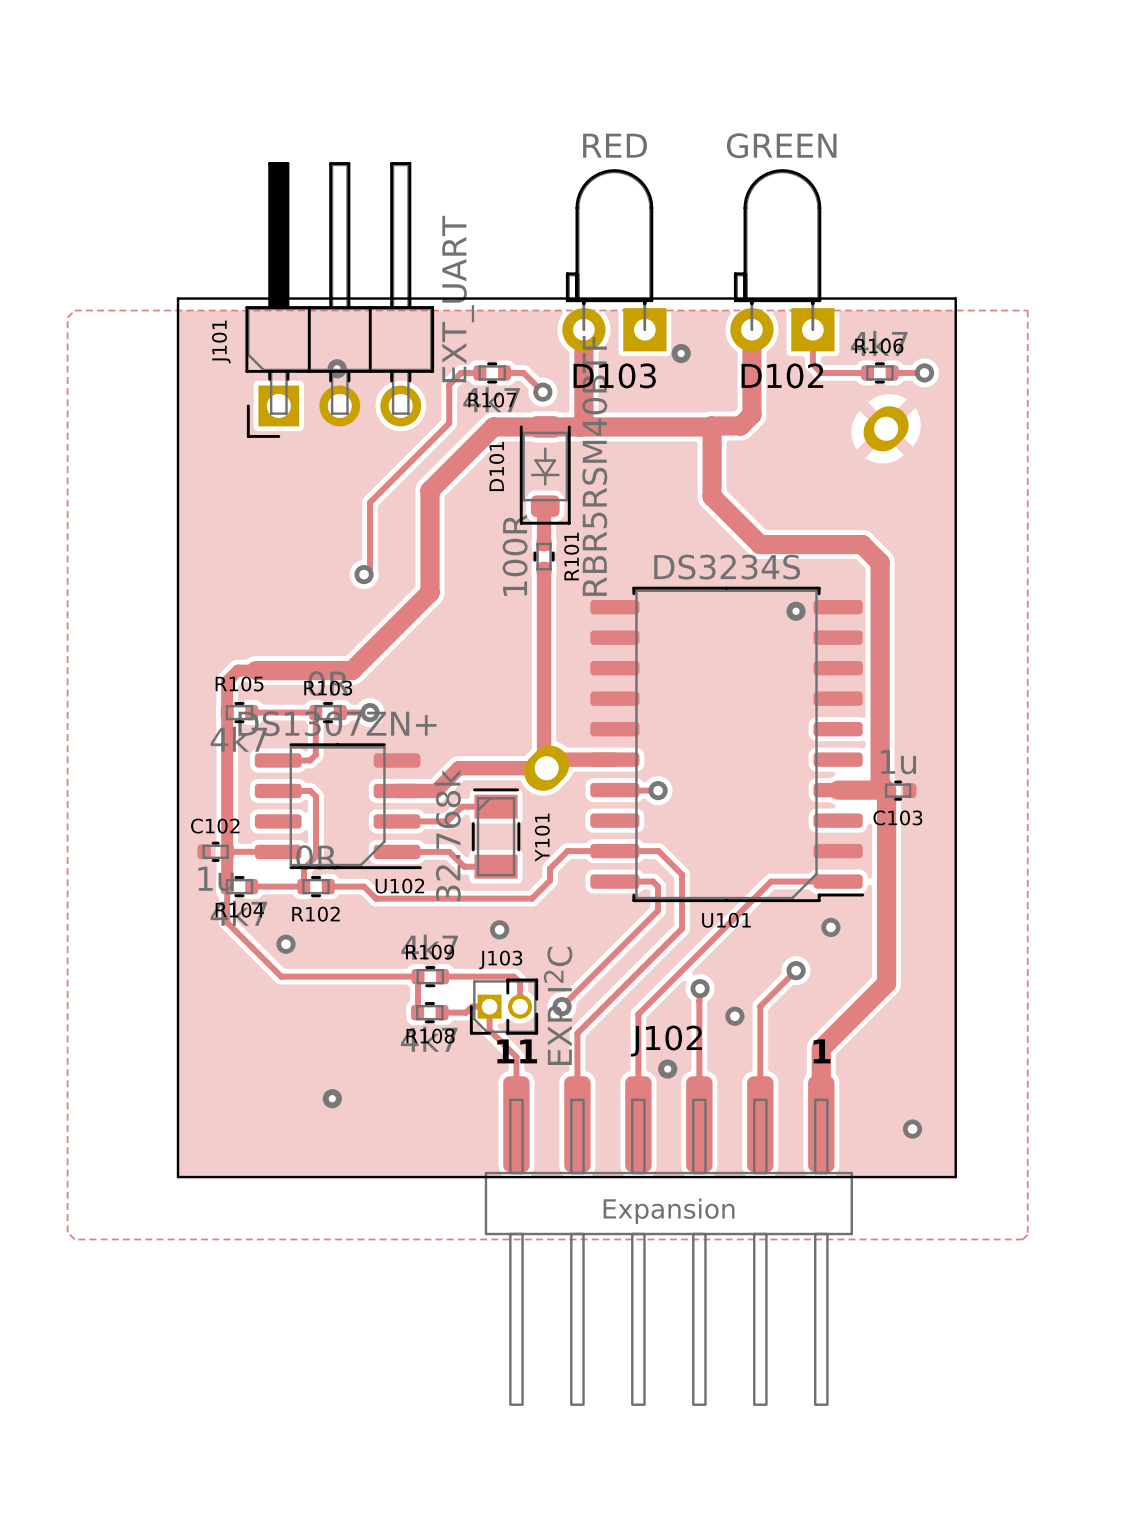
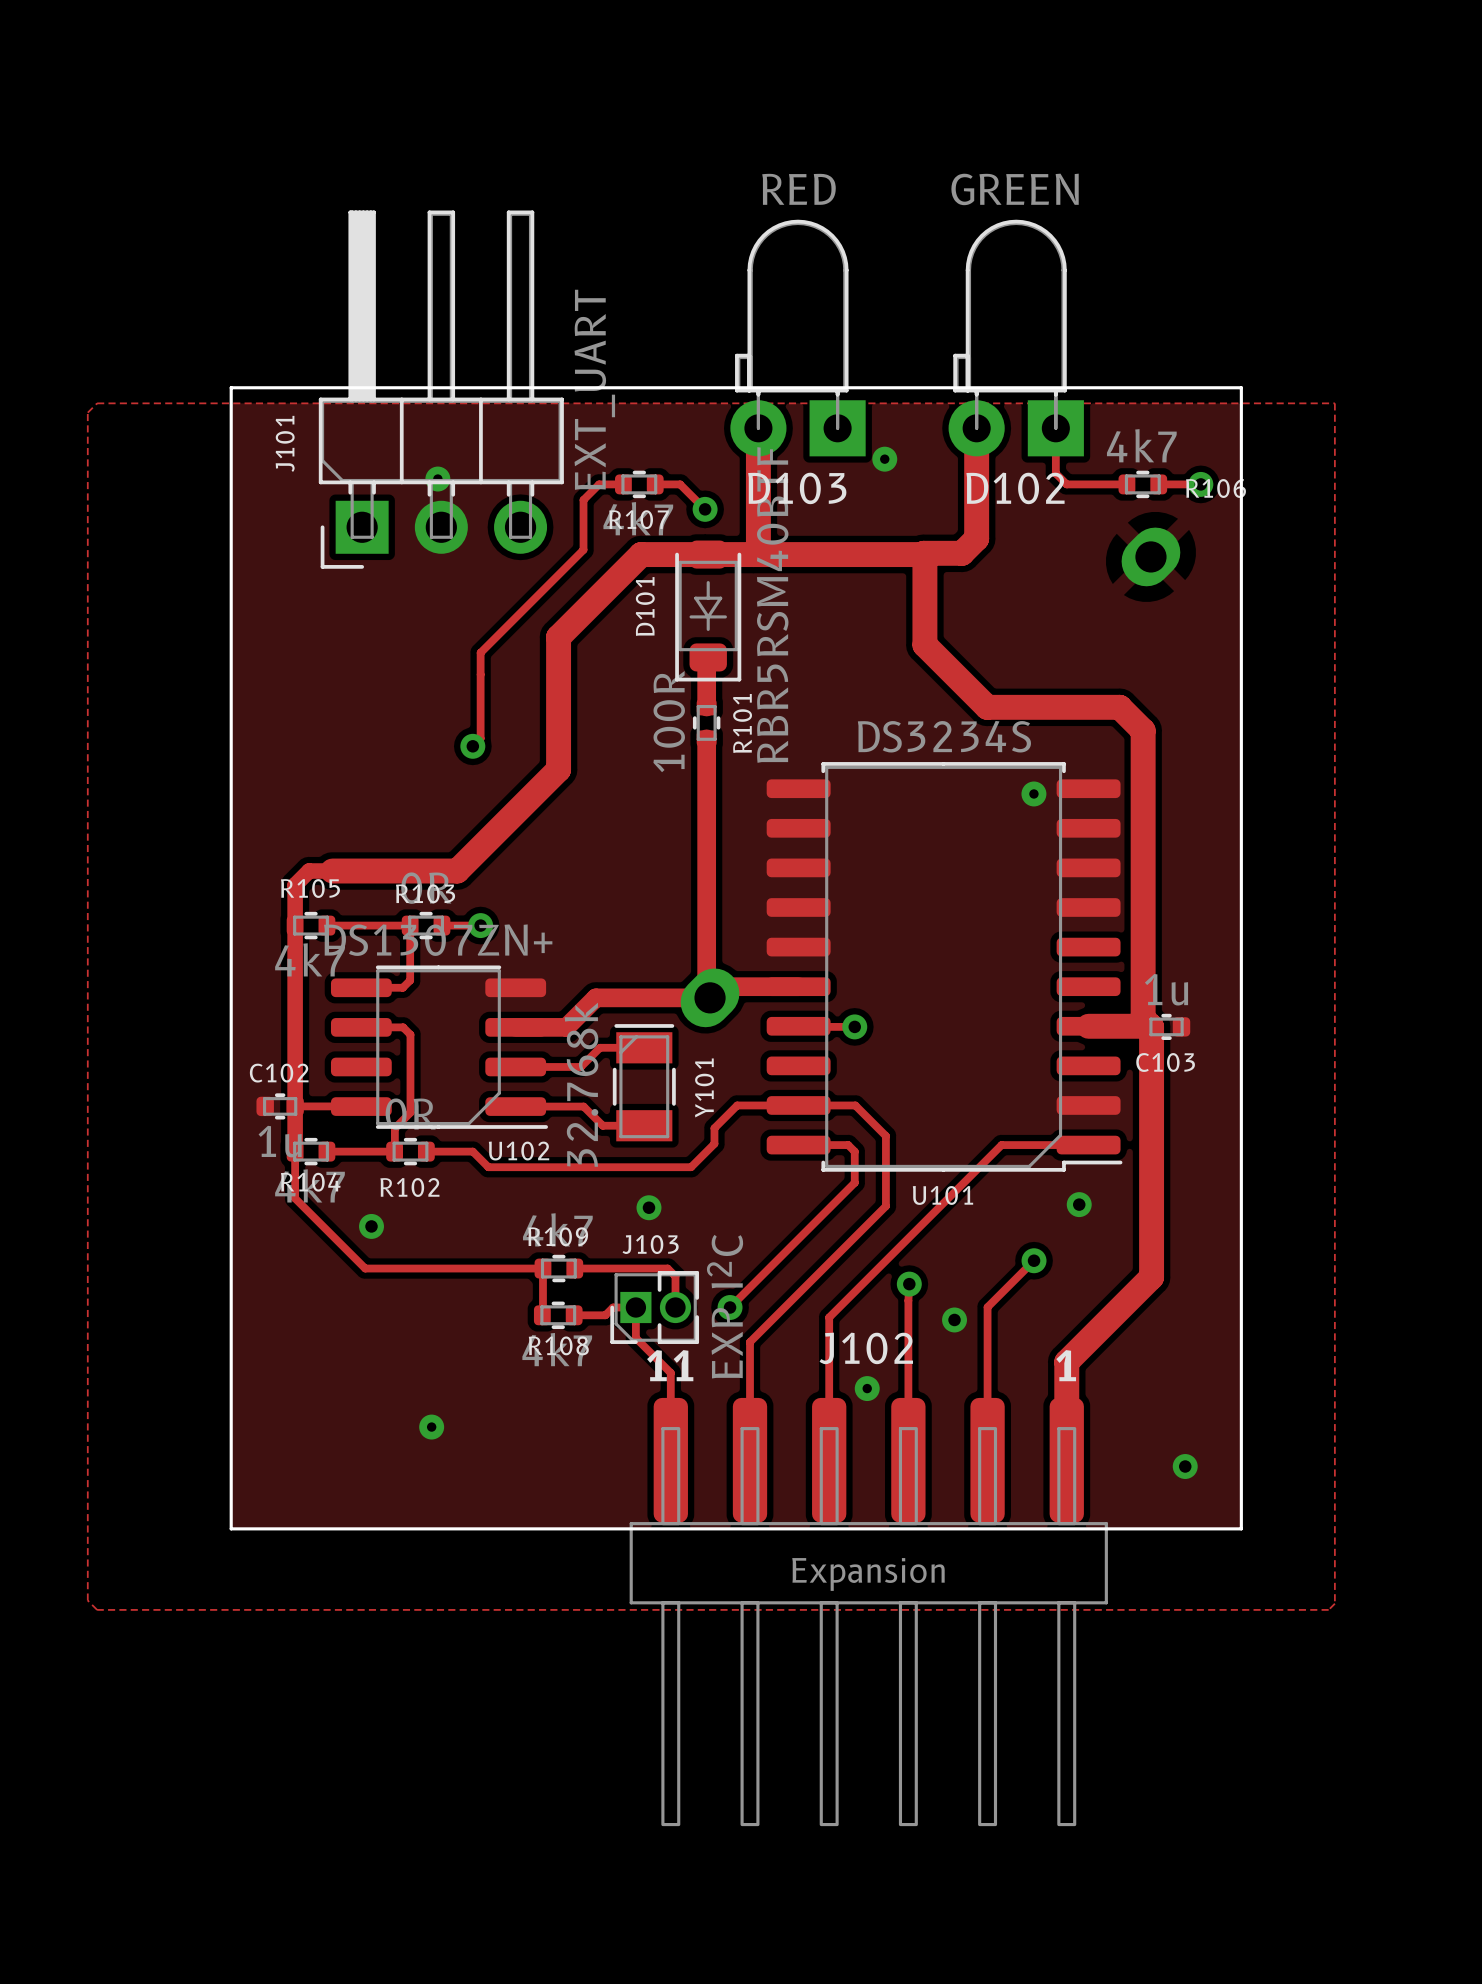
R106 name position: R106 (879, 346) -> R106 (1215, 488)

